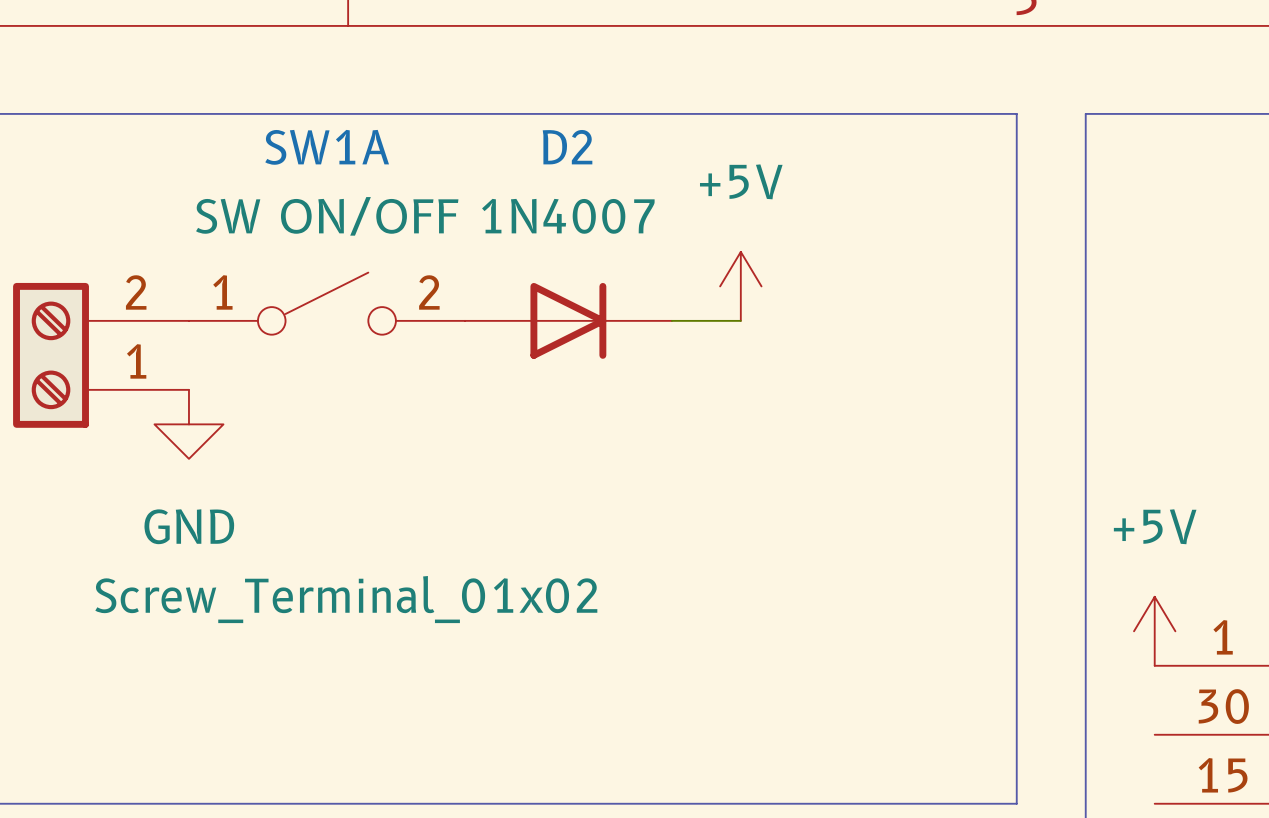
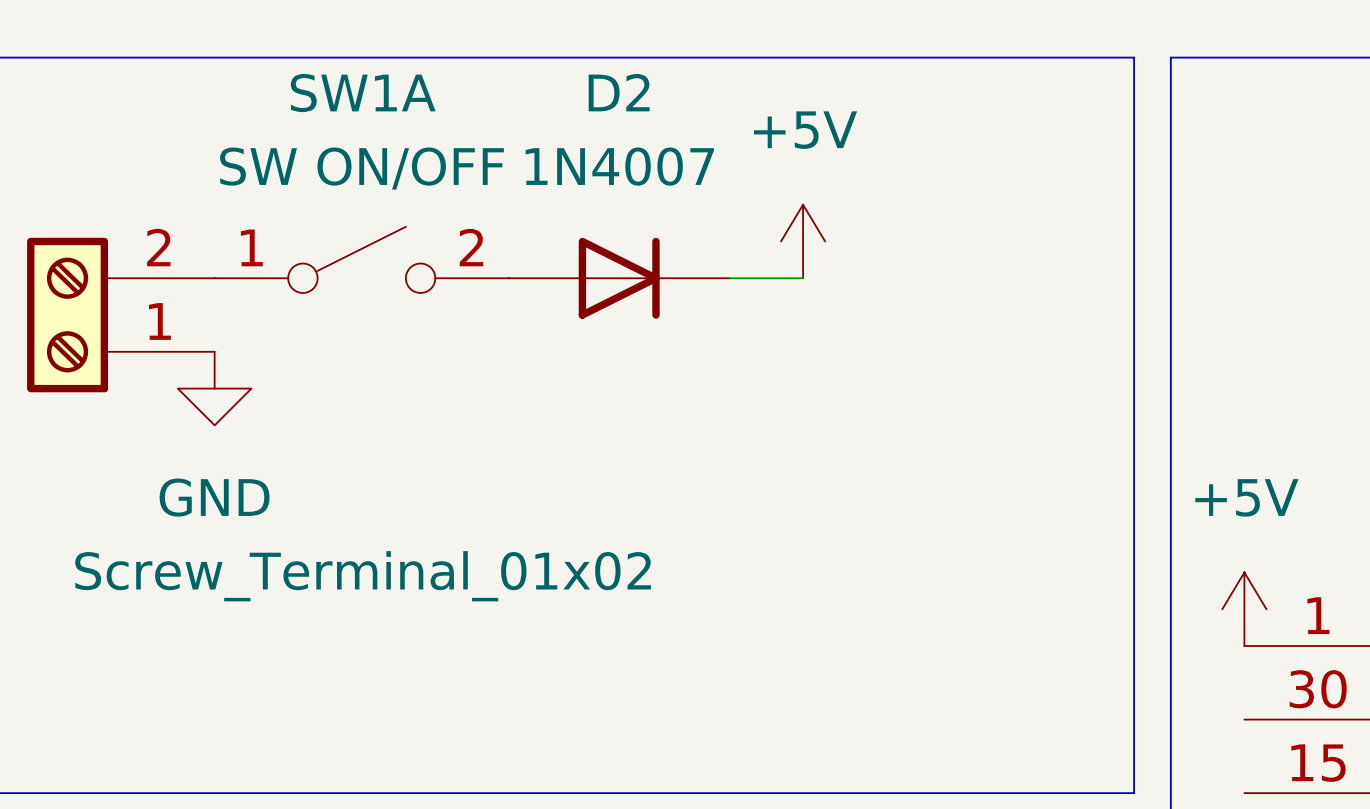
line: (1016, 113) (1016, 803) -> (1097, 57) (1134, 57) (1134, 793) (1097, 793)

